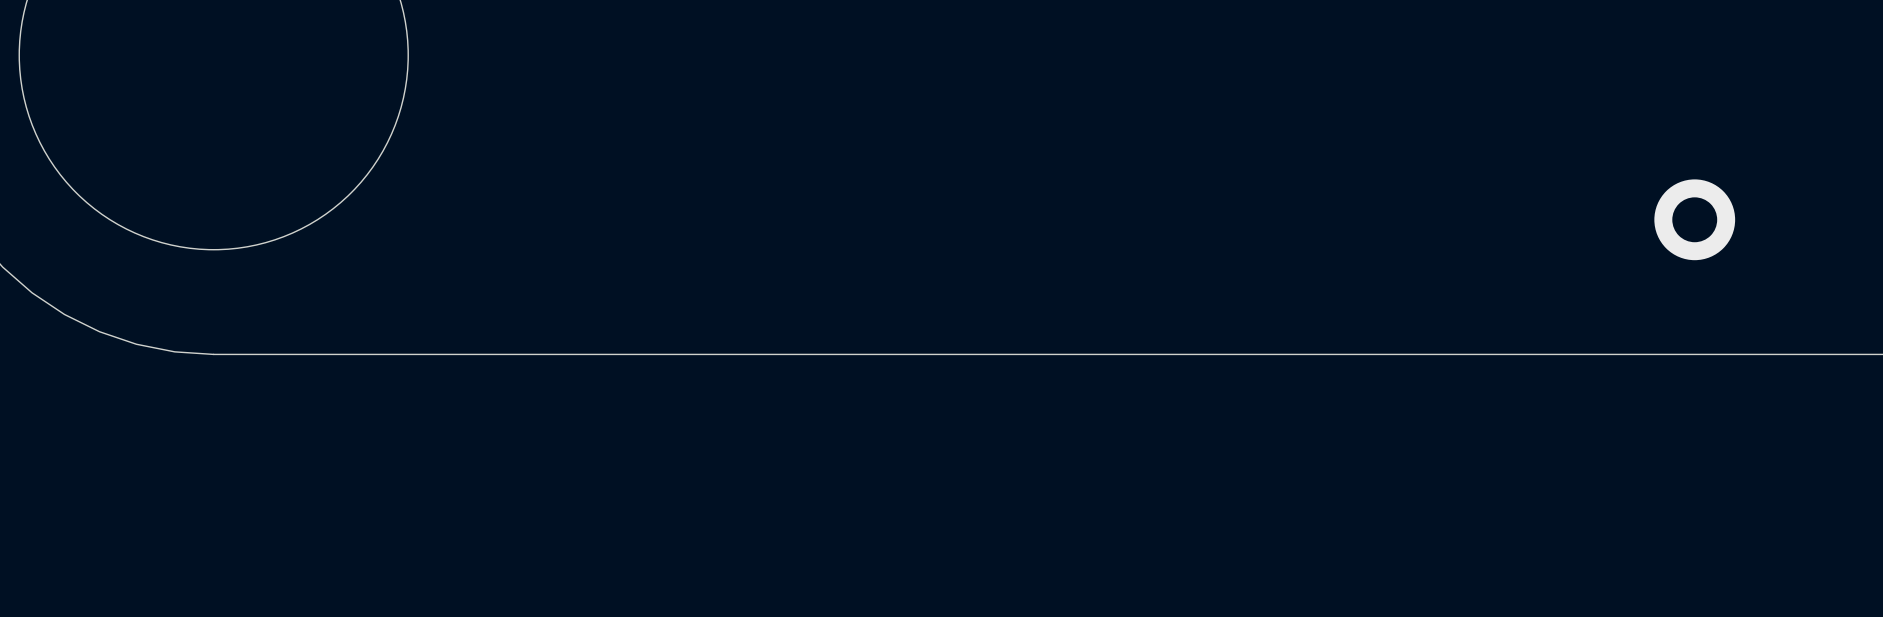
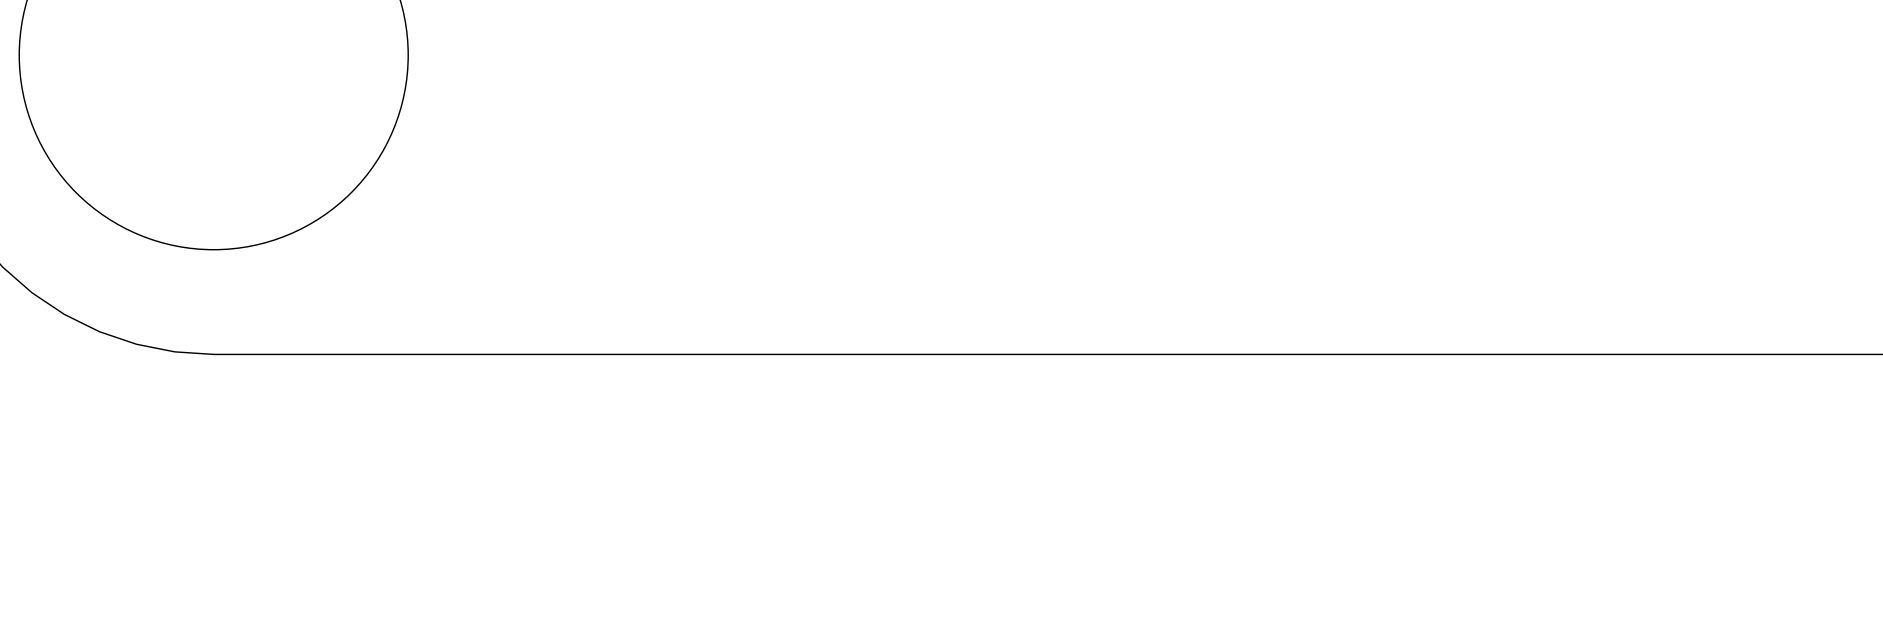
via: (1694, 219) -> none

